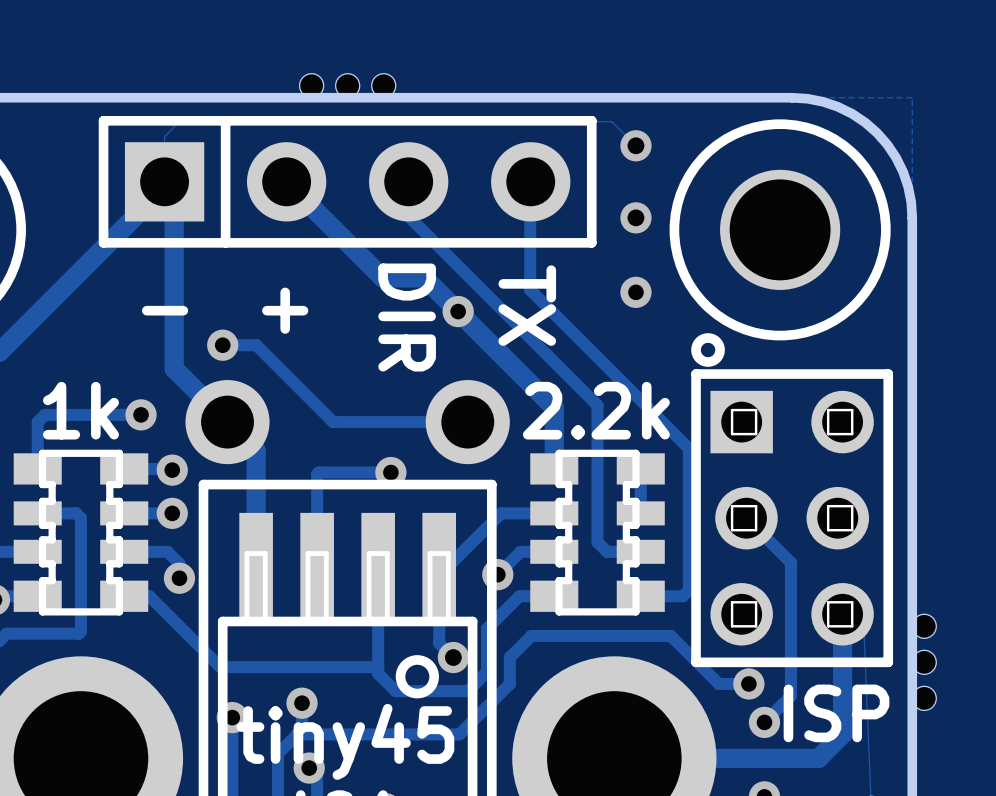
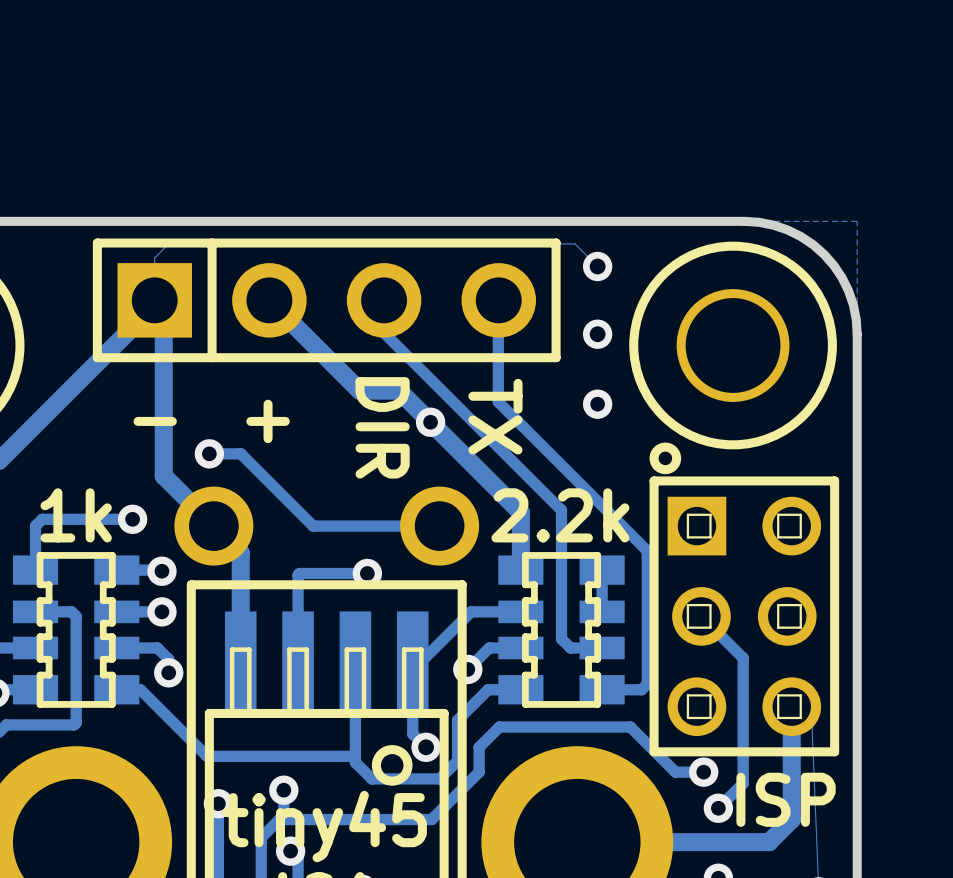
part: (311, 85) -> none
part: (347, 85) -> none
part: (383, 85) -> none
part: (924, 626) -> none
part: (924, 662) -> none
part: (924, 698) -> none

